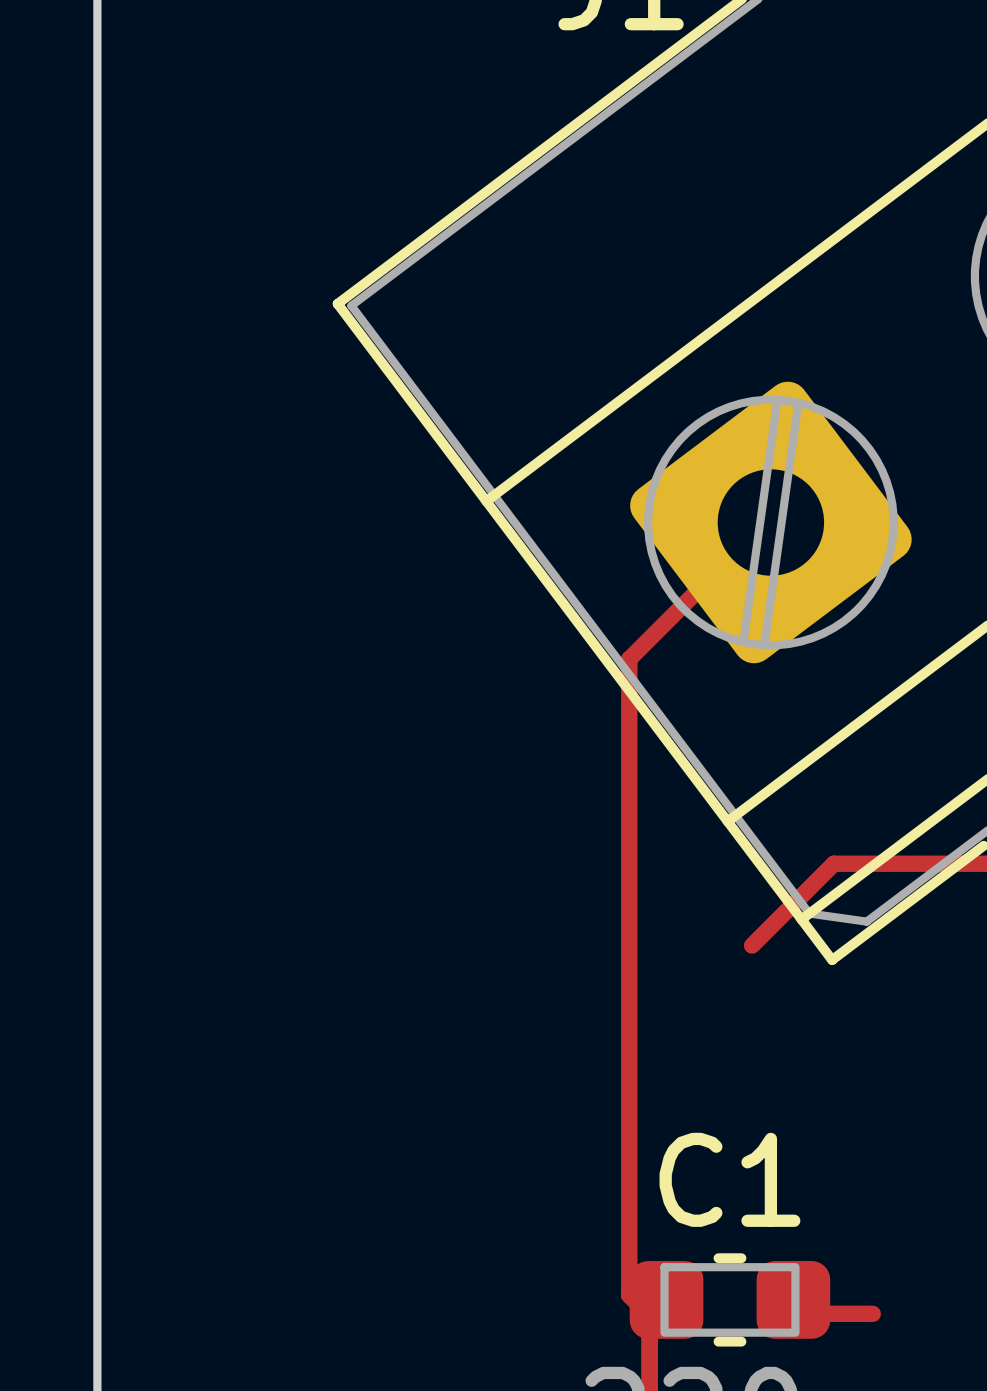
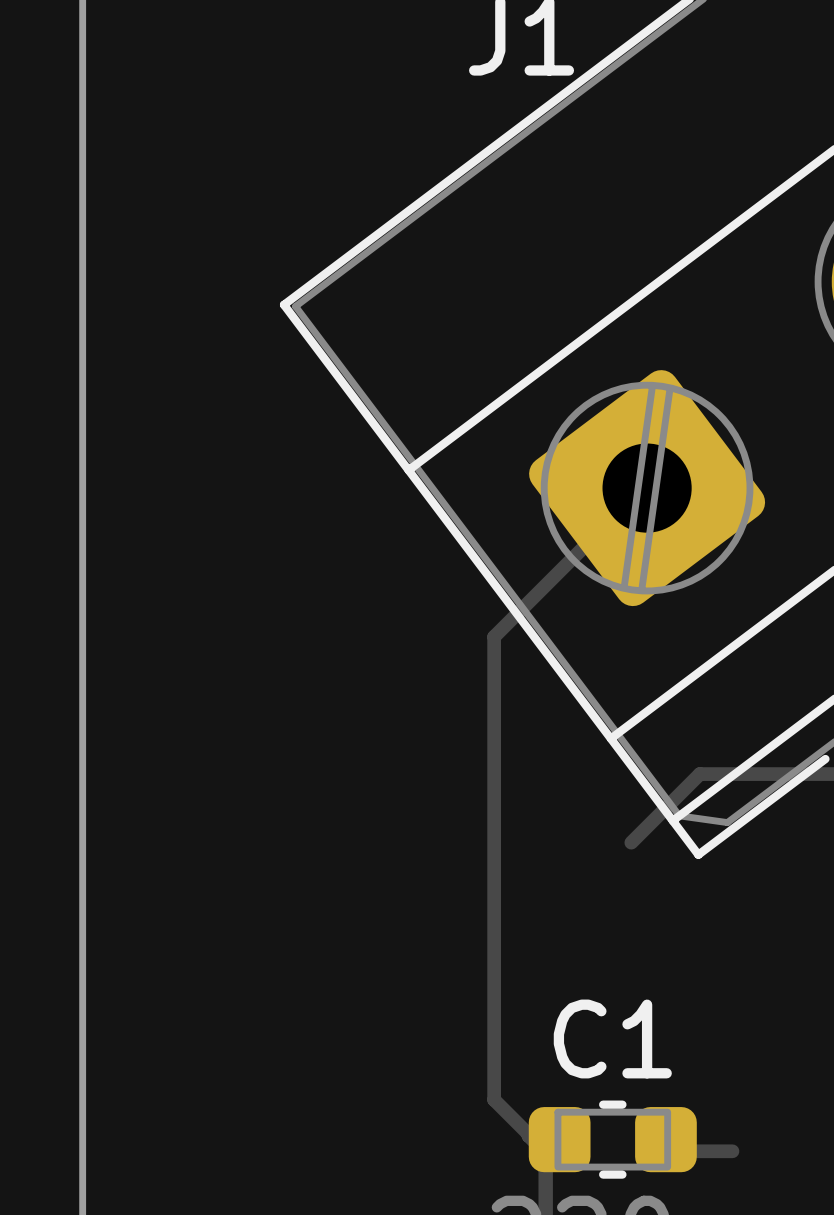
track: (629, 659) (629, 1293) -> (528, 602) (494, 636) (494, 1099) (528, 1134)

